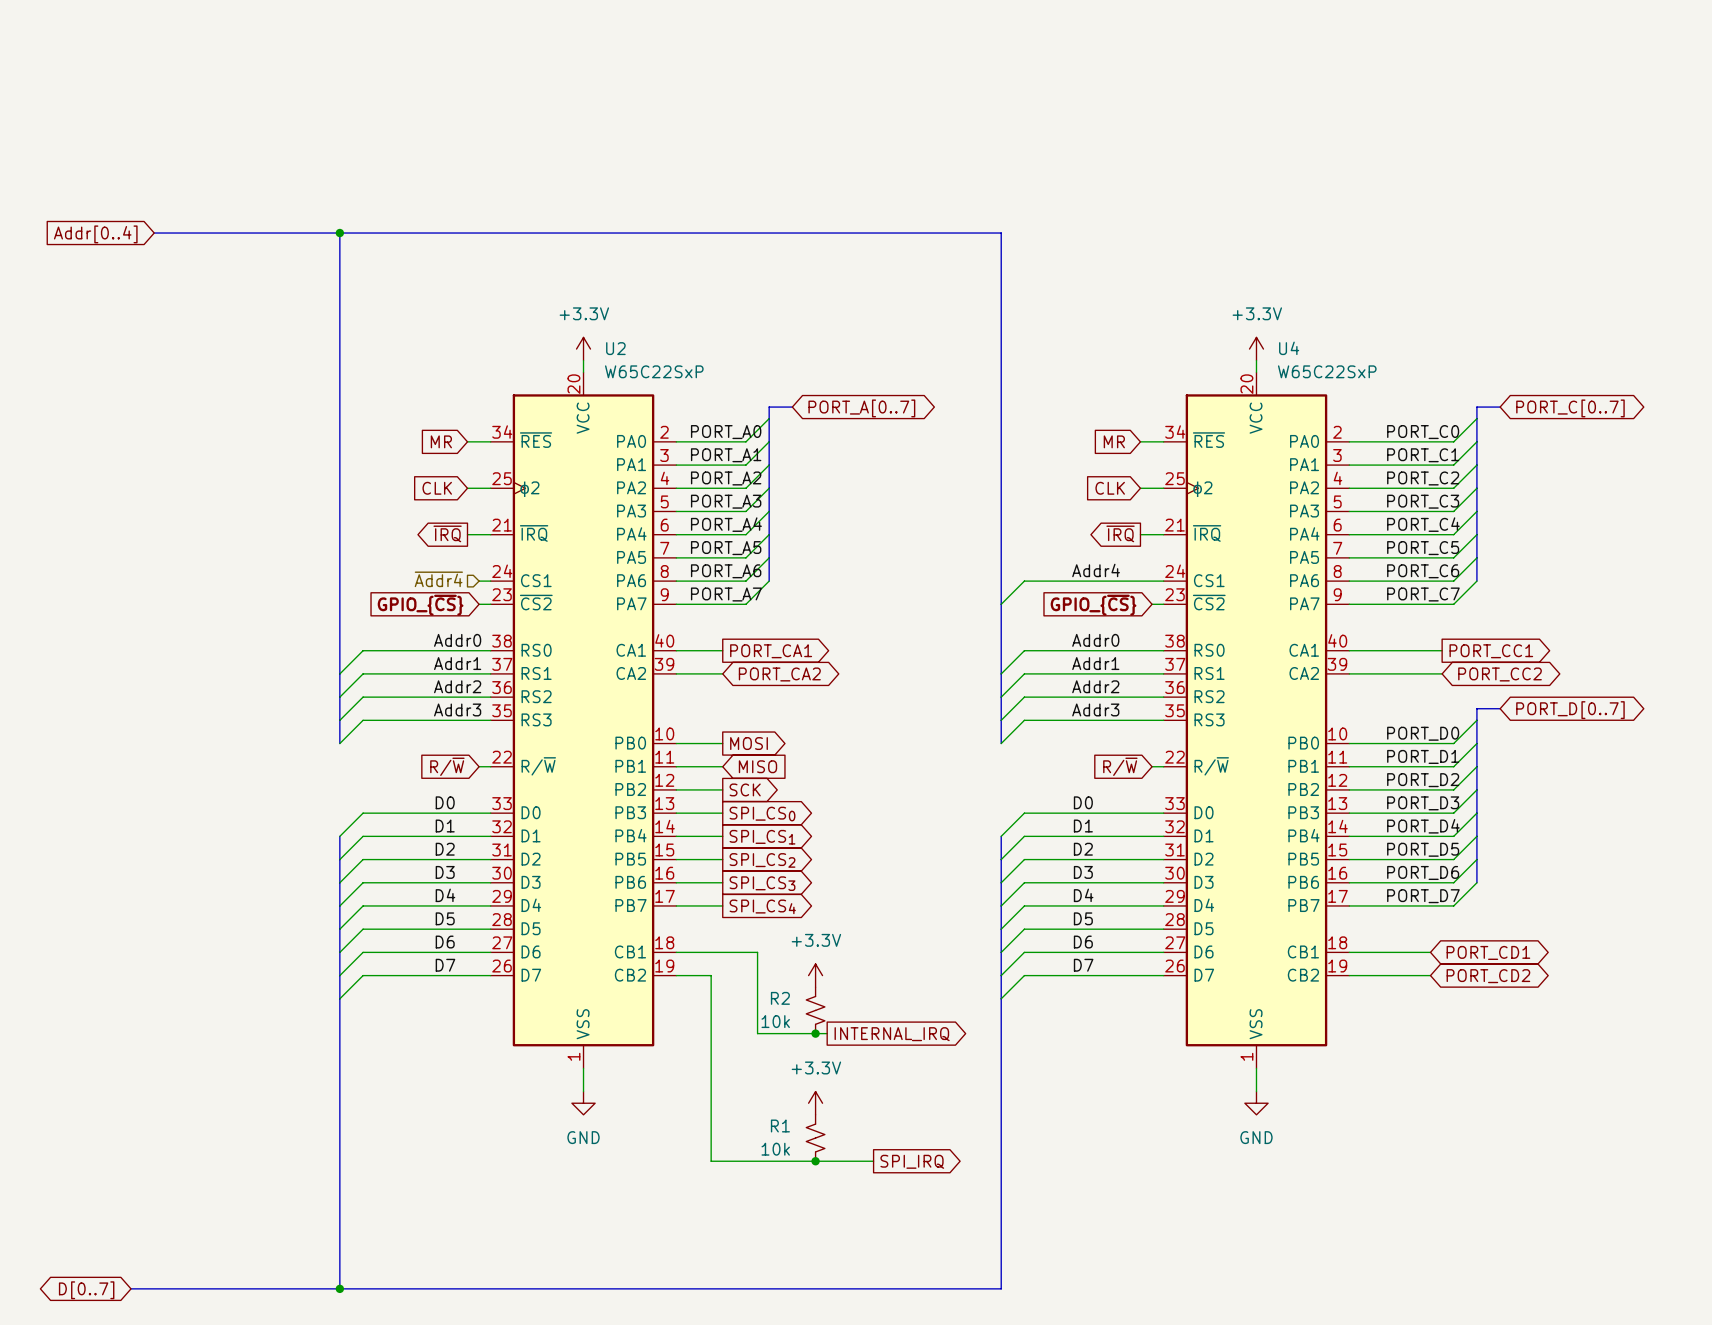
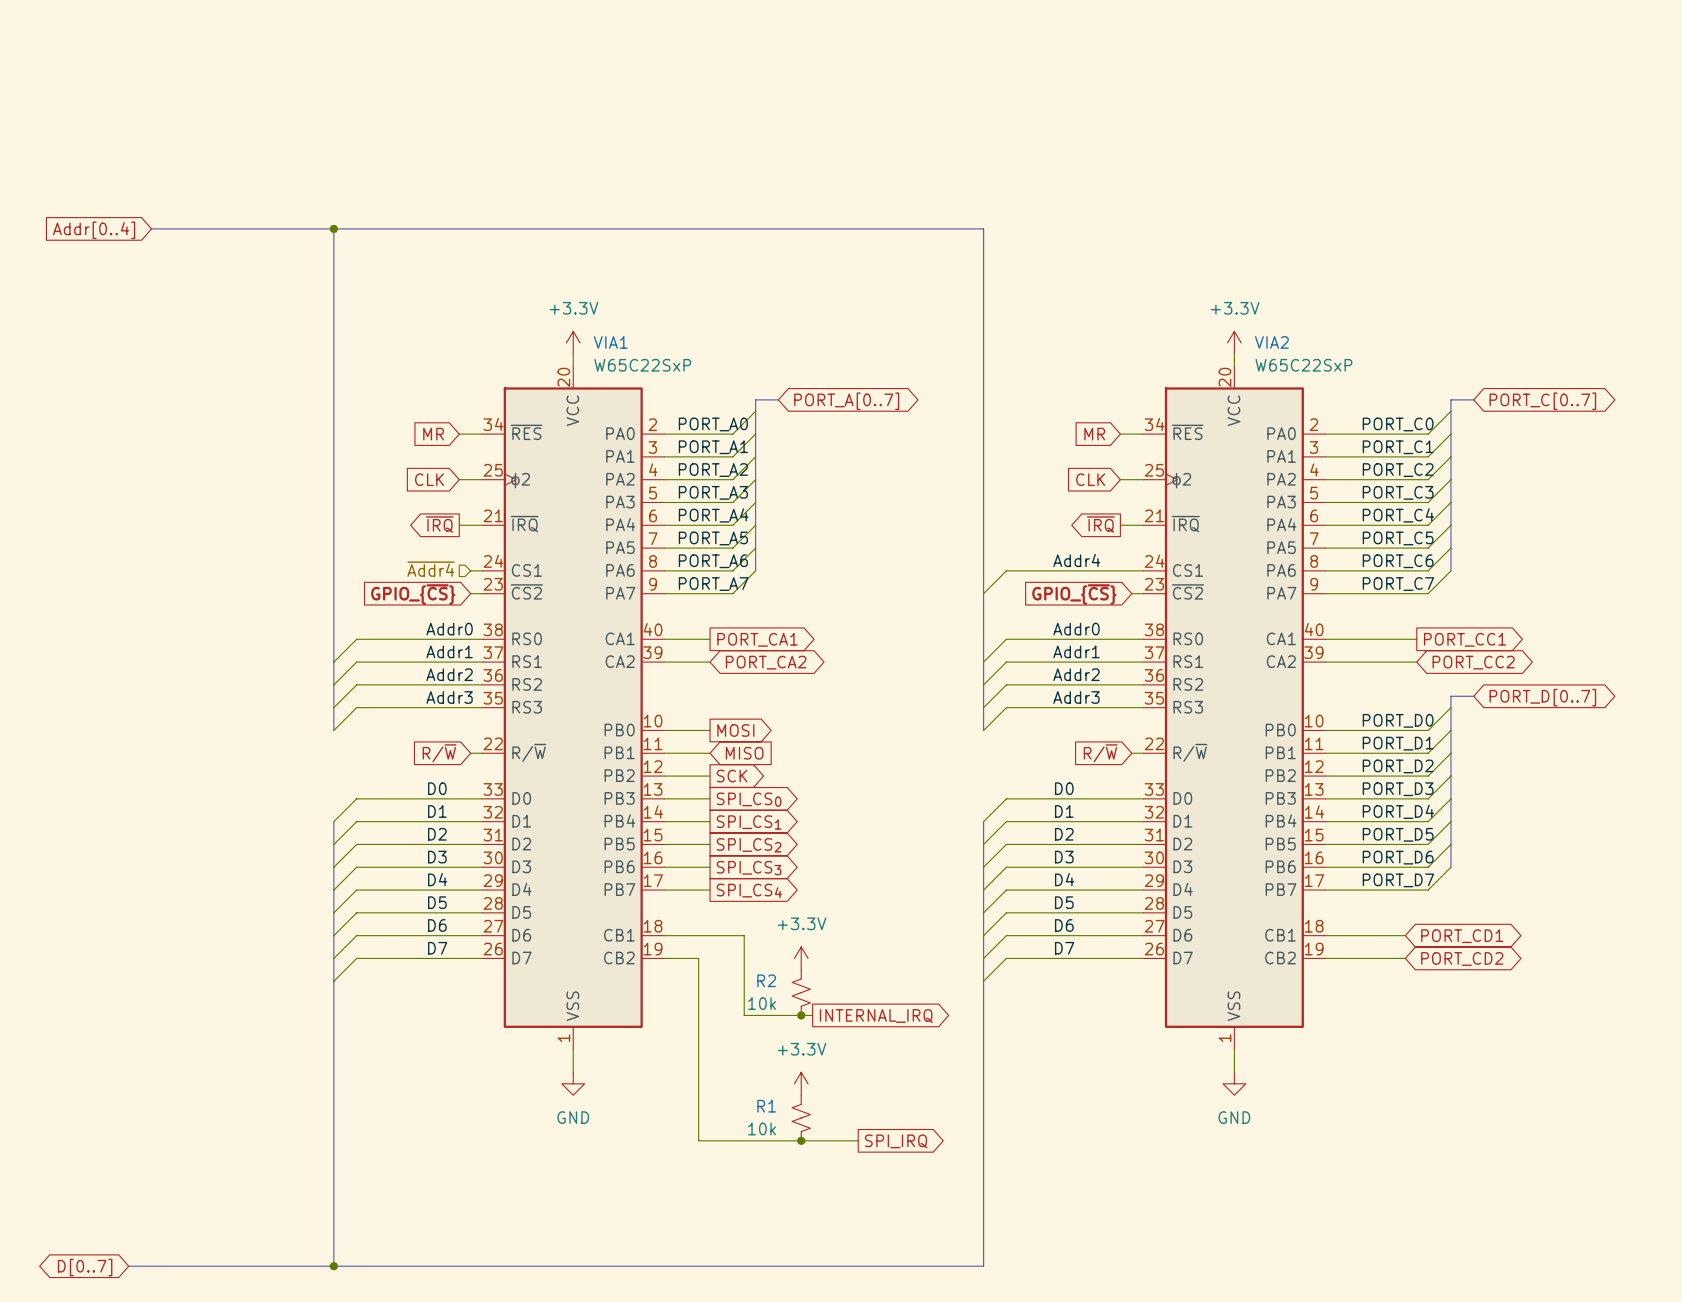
U2 name: U2 (615, 348) -> VIA1 (610, 342)
U4 name: U4 (1289, 348) -> VIA2 (1271, 342)

